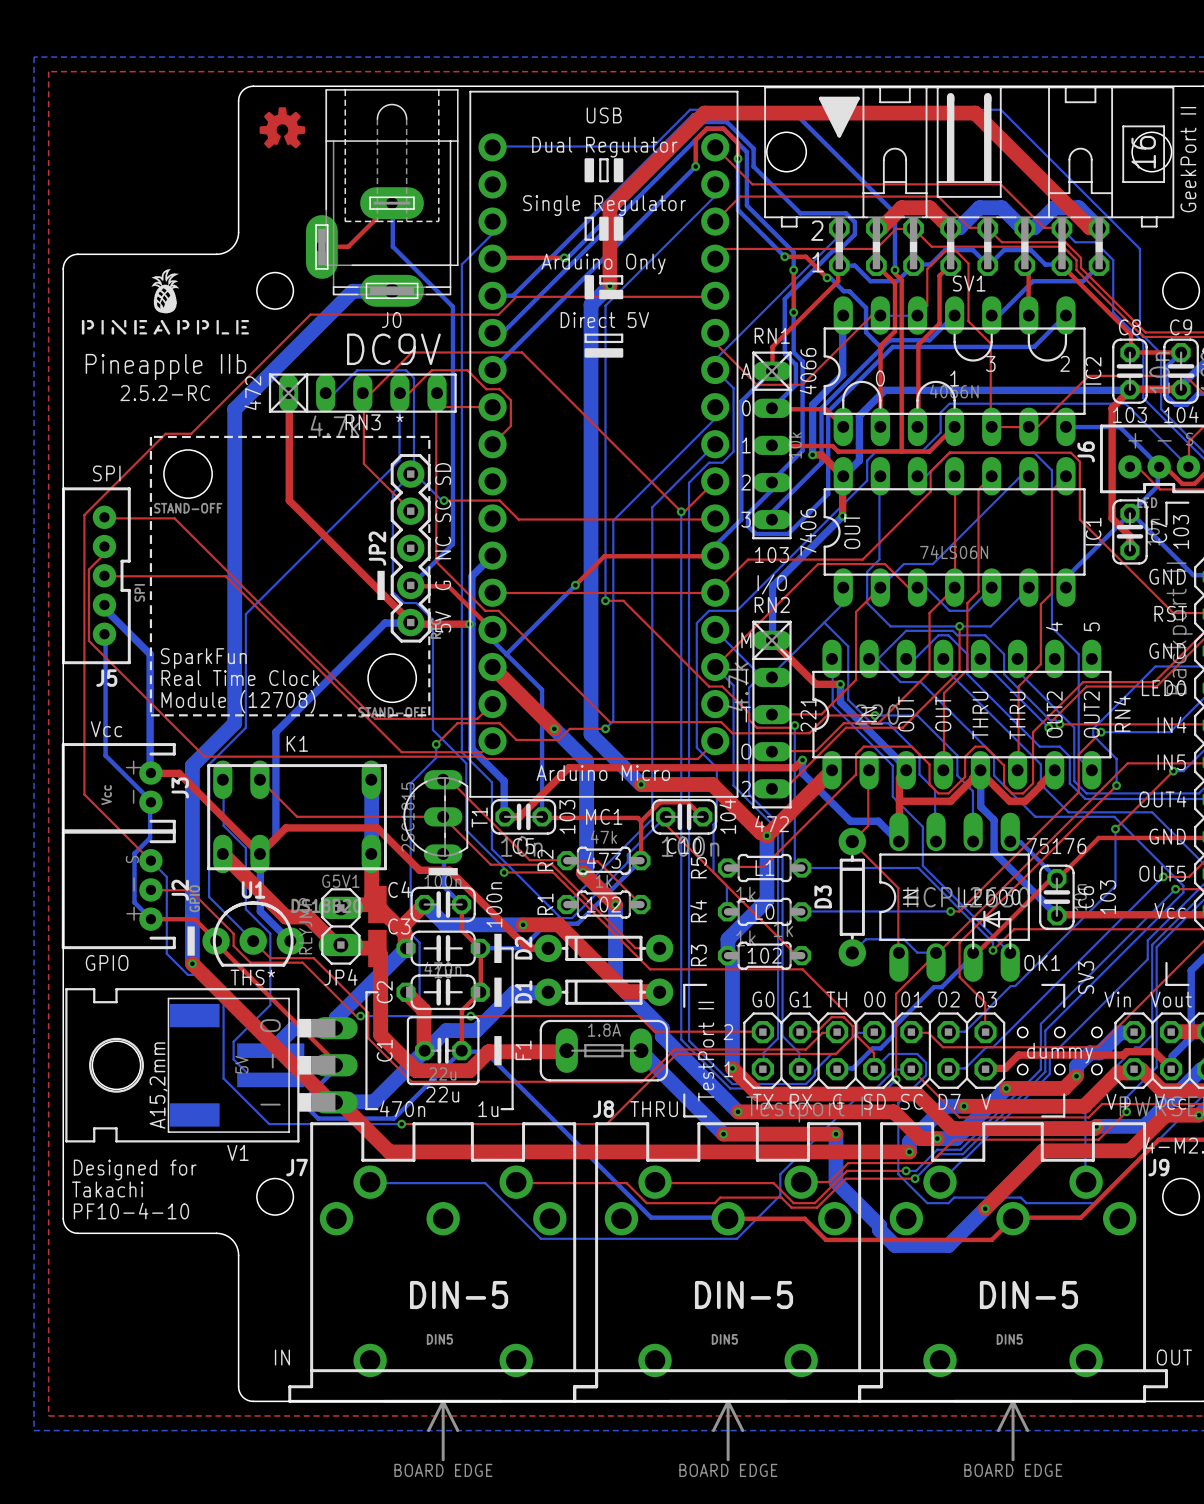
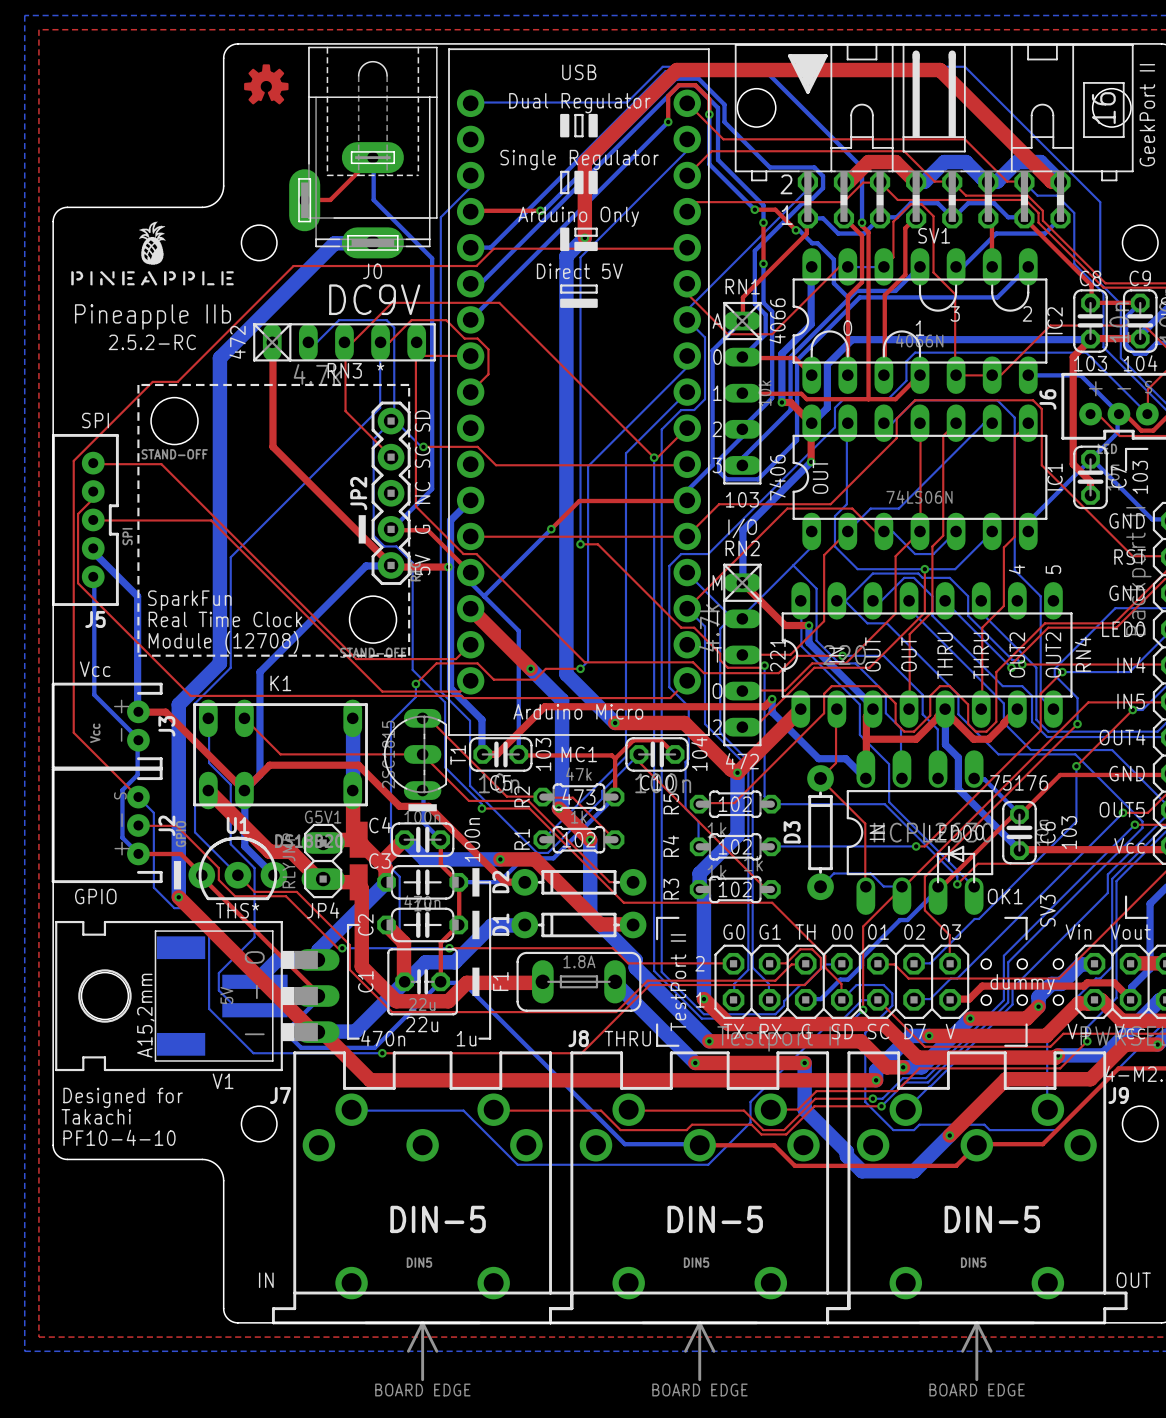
text: L1 (764, 868) -> 102 (735, 804)
text: L0 (764, 911) -> 102 (735, 846)

